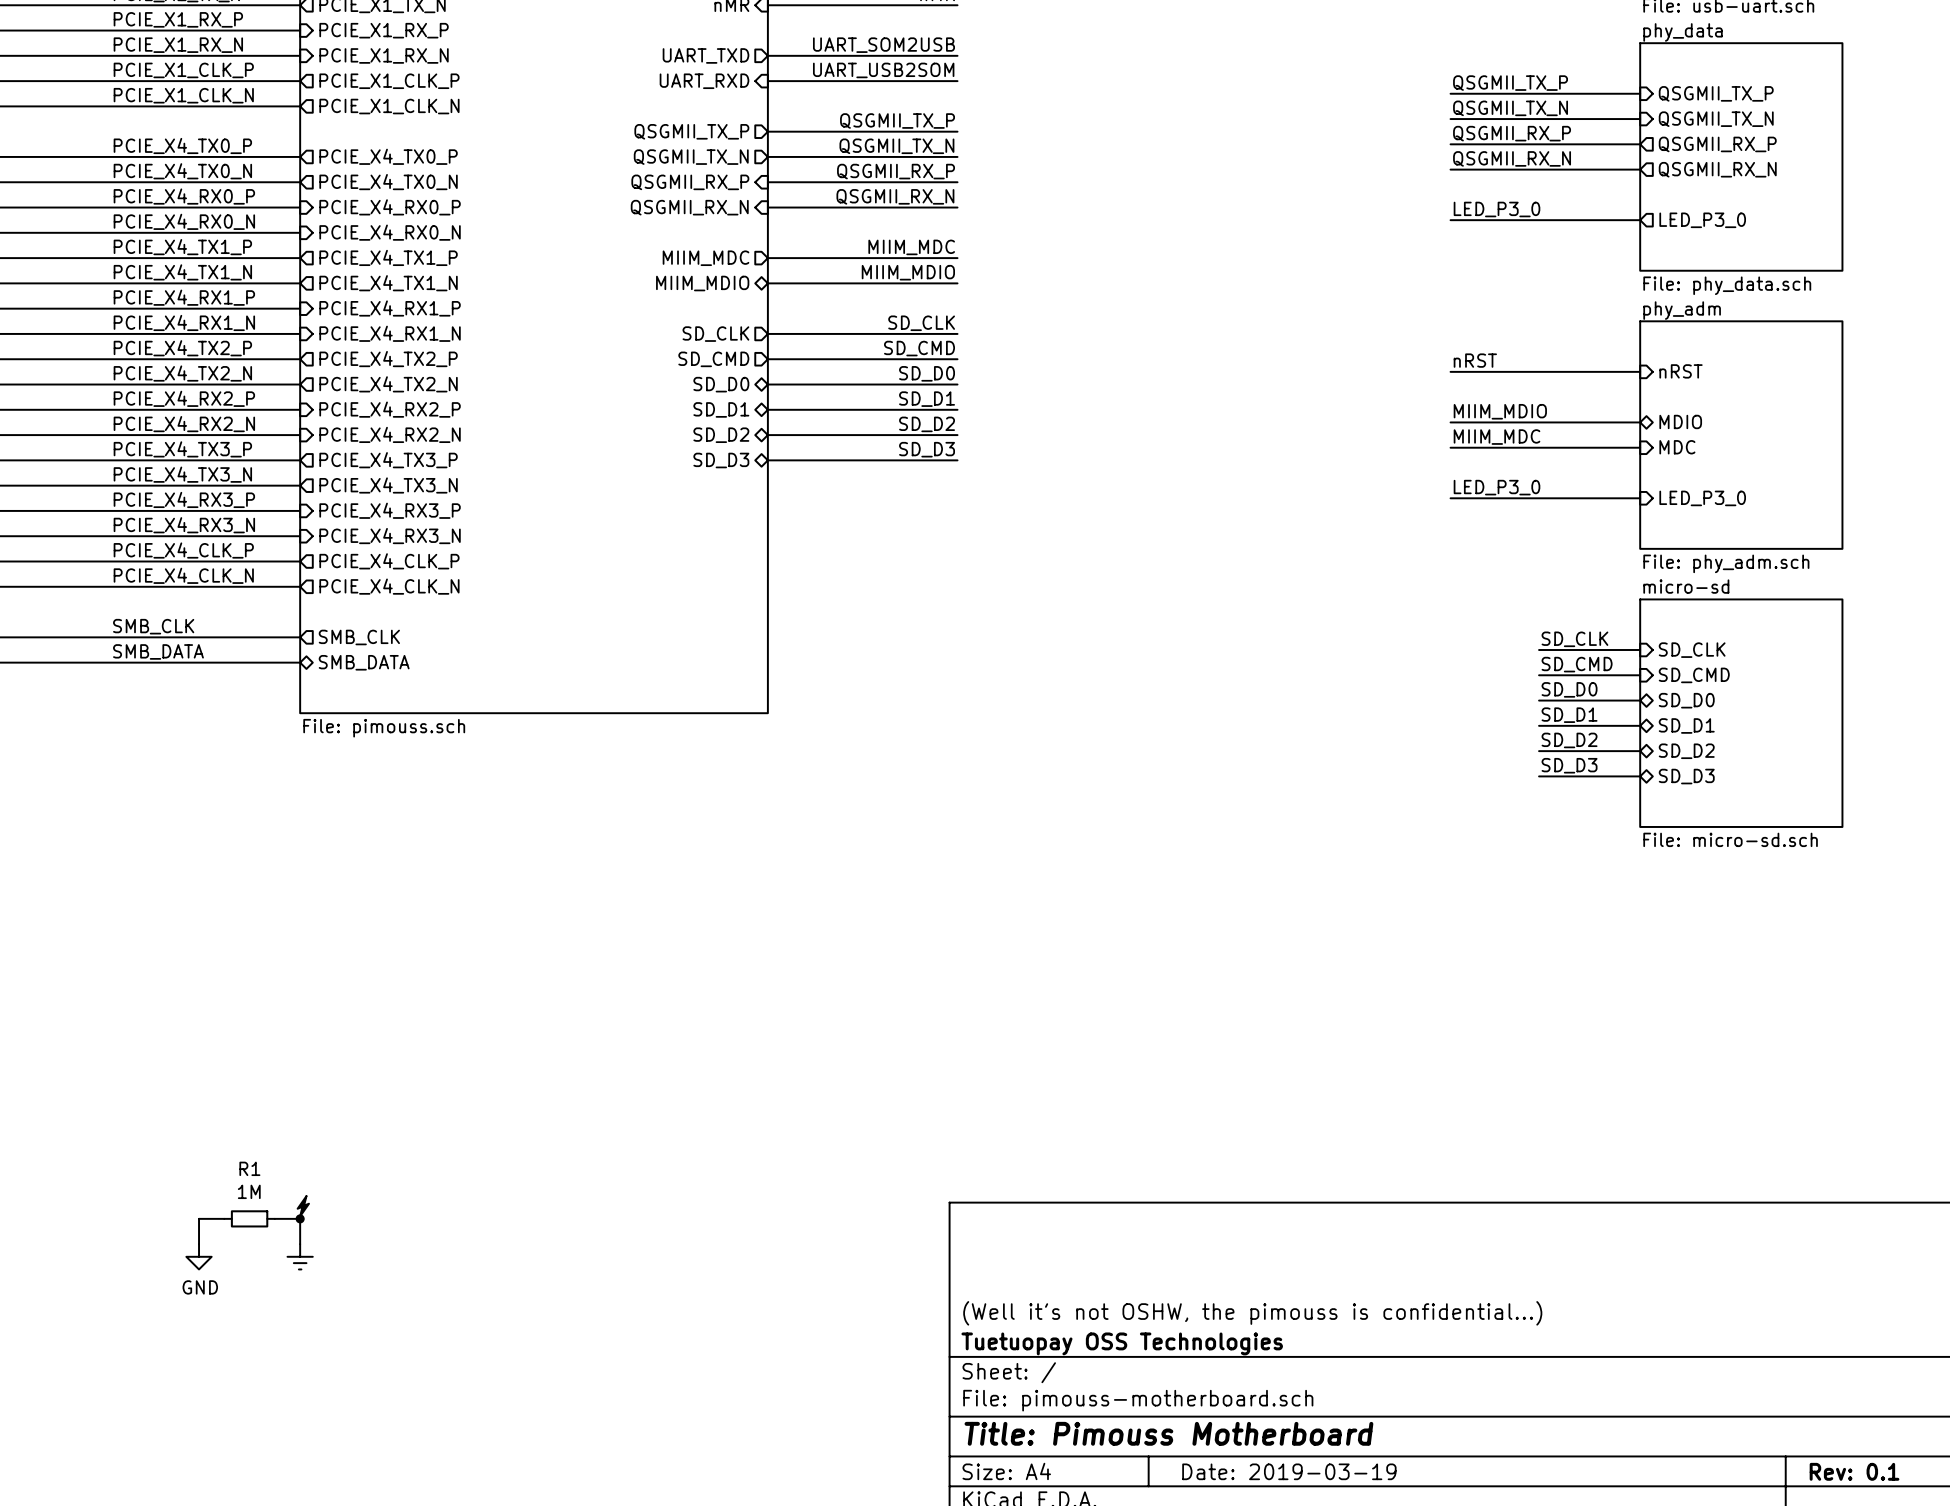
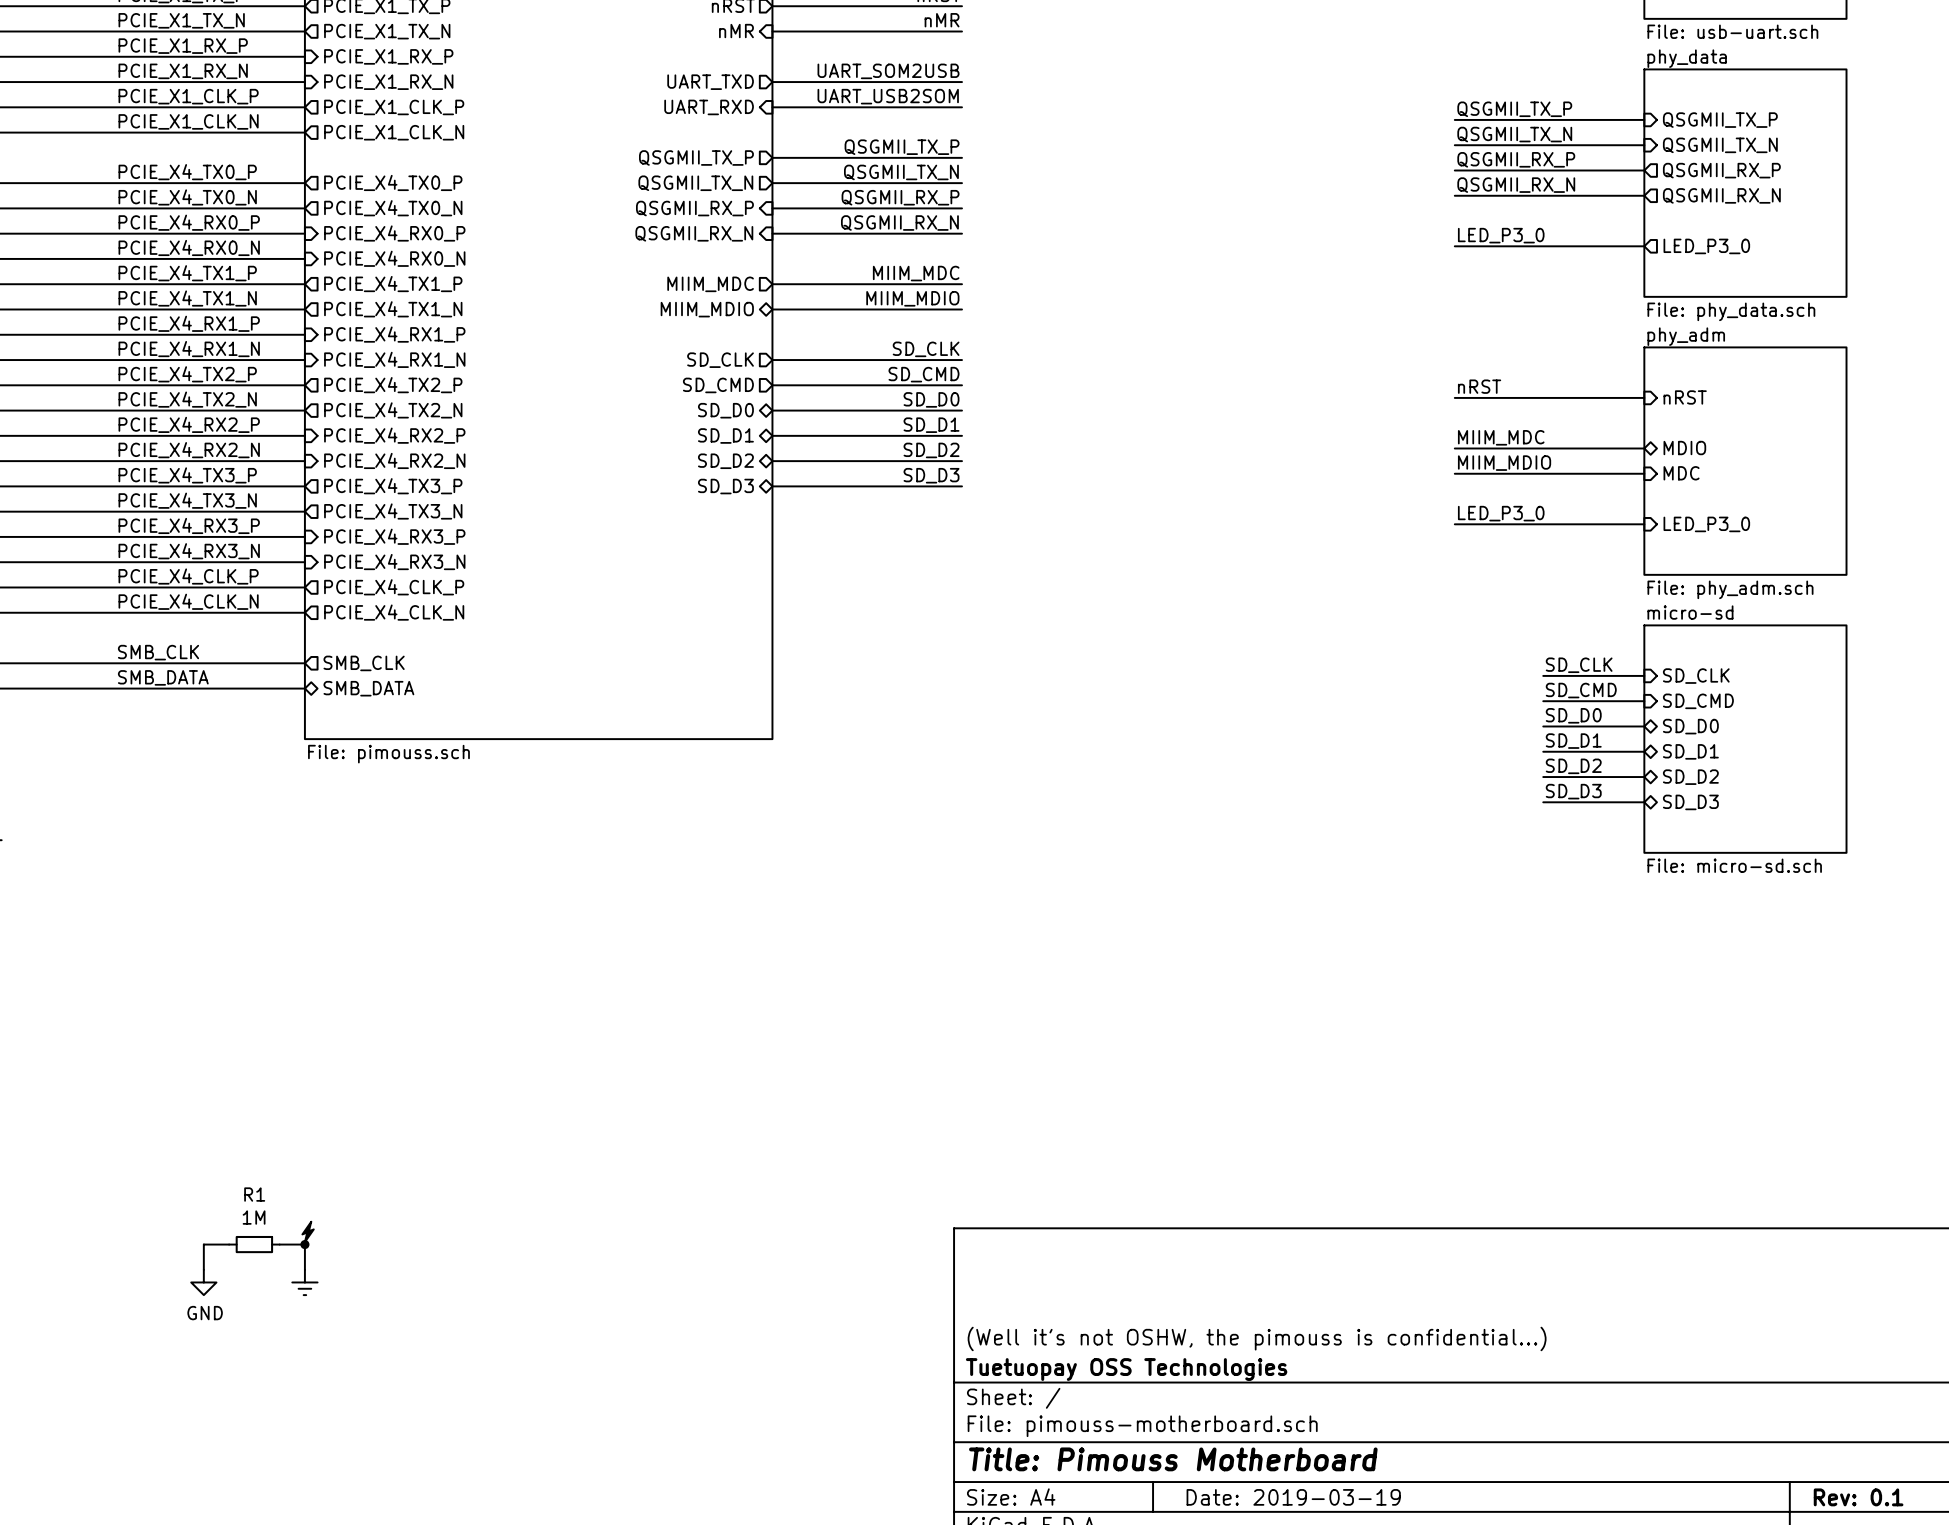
label: MIIM_MDIO (1500, 411) -> MIIM_MDC (1501, 437)
label: MIIM_MDC (1497, 437) -> MIIM_MDIO (1504, 463)

